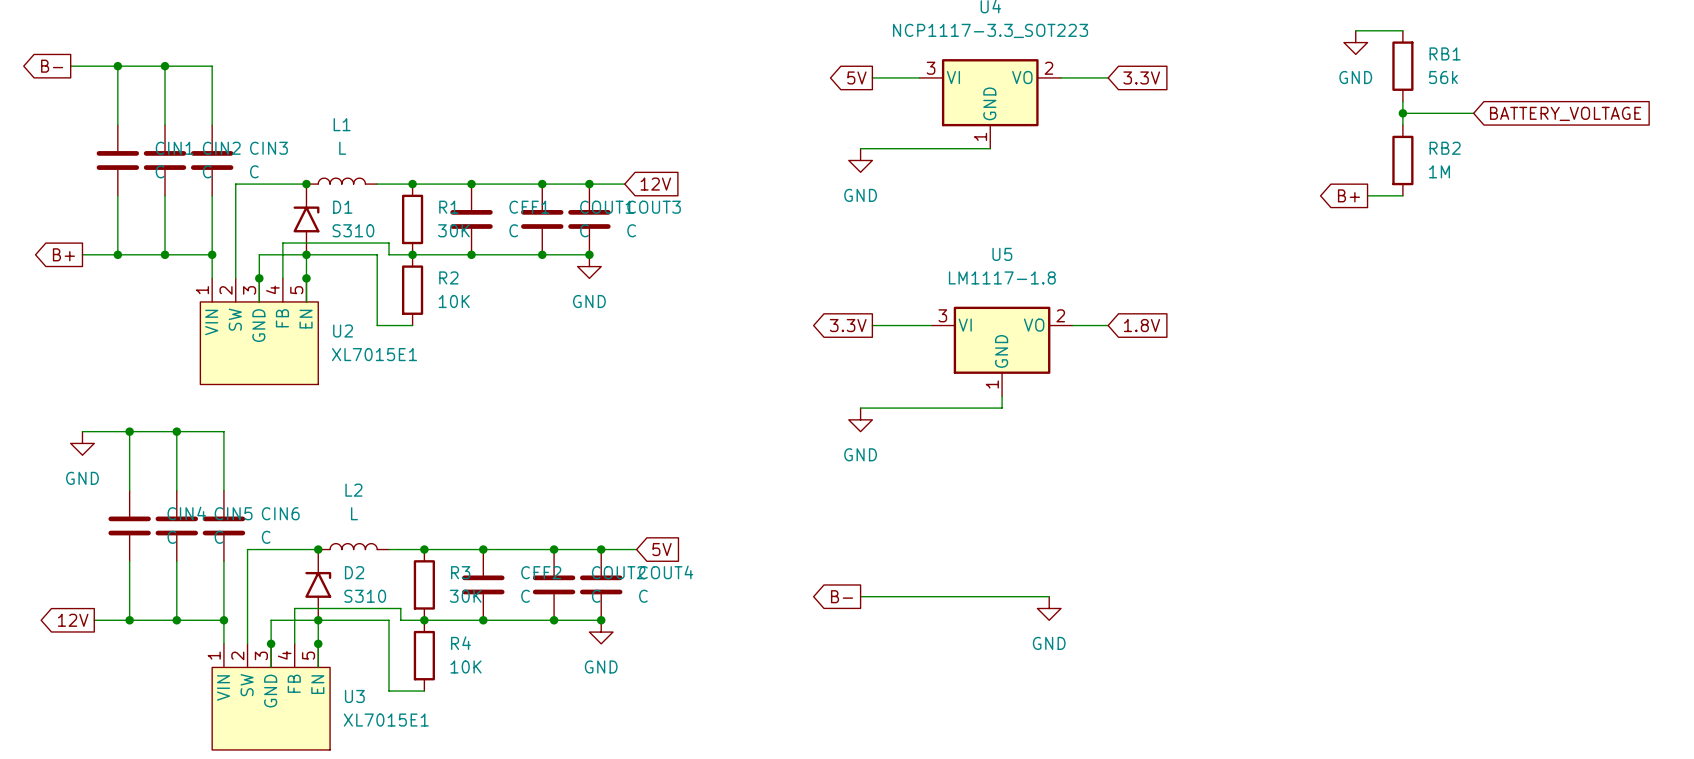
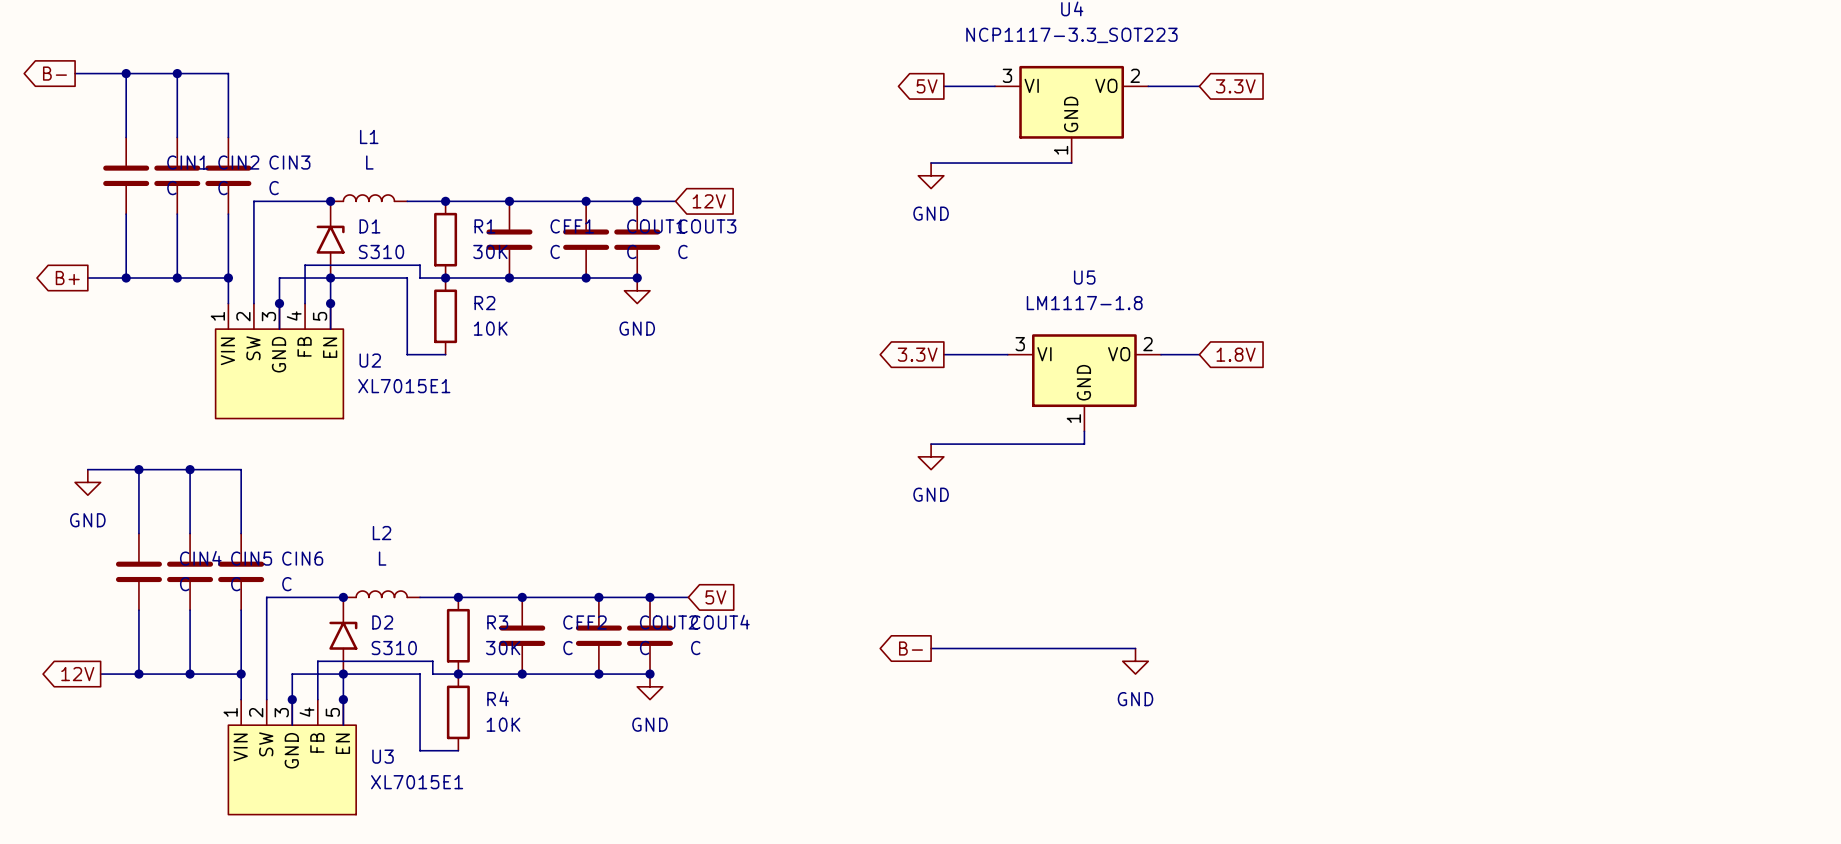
wire: (1355, 30) (1402, 30) -> none
power symbol: GND (1355, 42) -> none
RB1: 56k (1402, 66) -> none
wire: (1402, 101) (1402, 125) -> none
wire: (1402, 113) (1473, 113) -> none
junction: (1402, 113) -> none
global label: BATTERY_VOLTAGE (1565, 113) -> none
RB2: 1M (1402, 160) -> none
global label: B+ (1348, 195) -> none
wire: (1367, 195) (1402, 195) -> none

